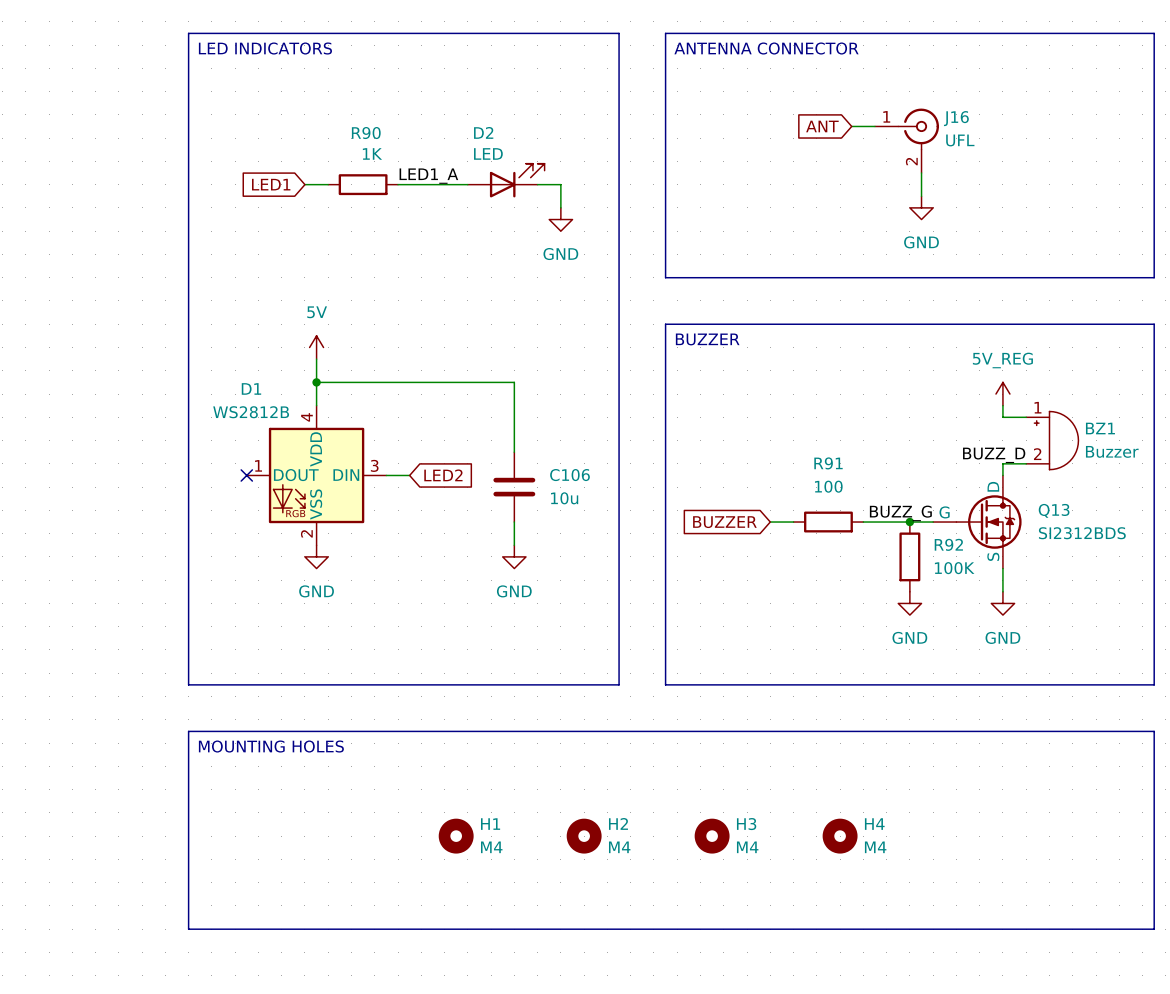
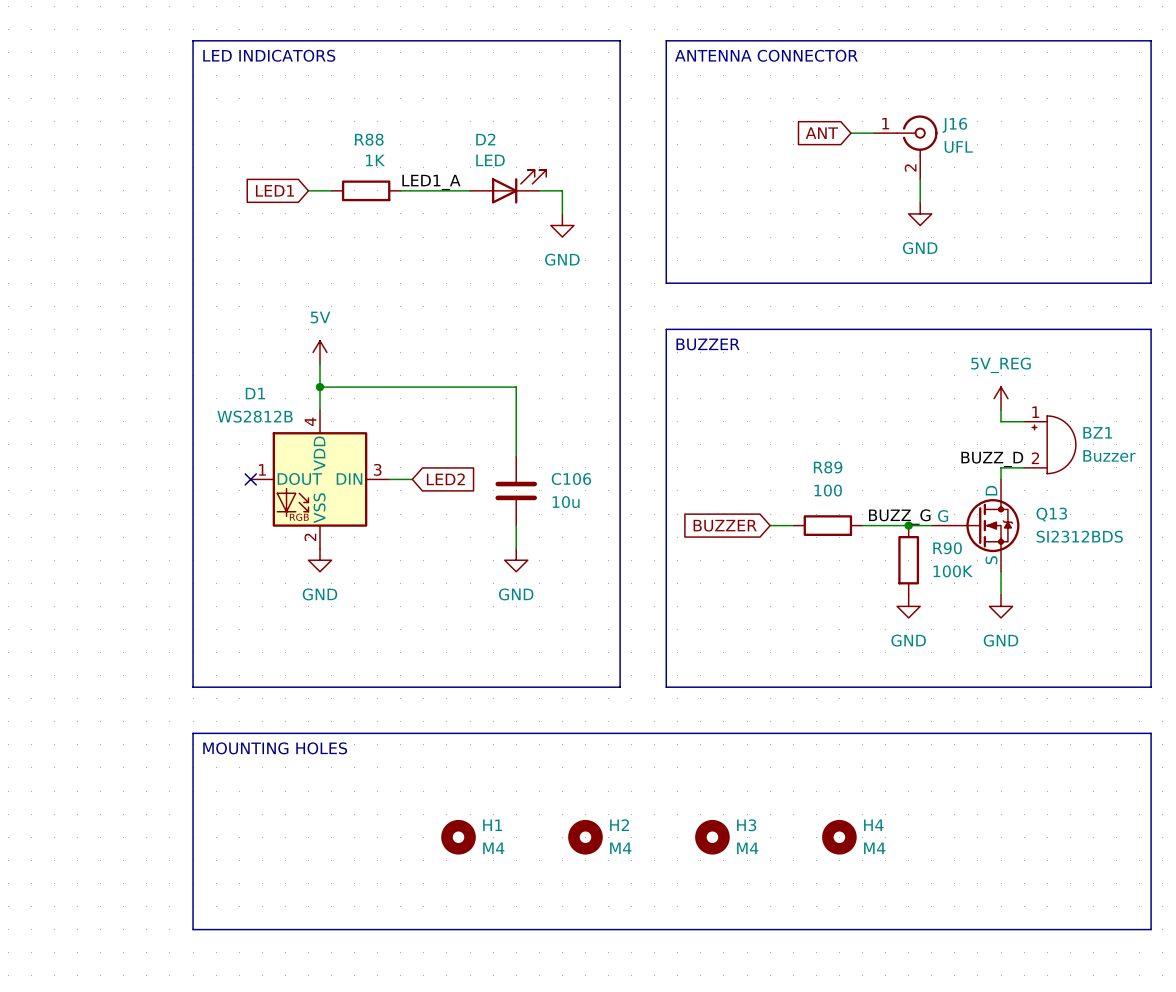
R90 name: R90 (366, 133) -> R88 (369, 139)
R91 name: R91 (828, 463) -> R89 (828, 467)
R92 name: R92 (948, 544) -> R90 (947, 548)

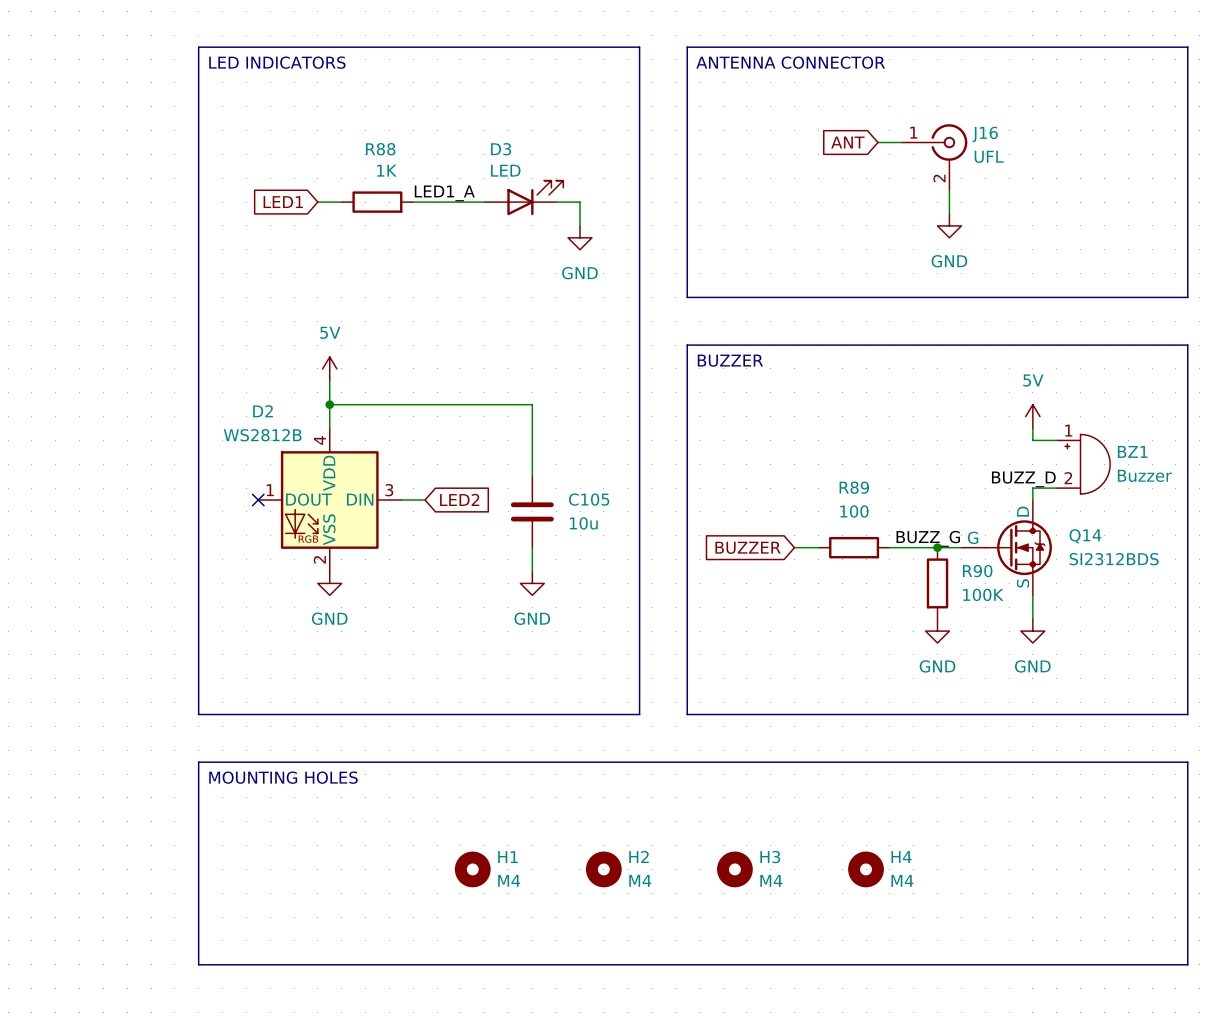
D2 name: D2 (485, 139) -> D3 (501, 149)
D1 name: D1 (255, 393) -> D2 (263, 411)
power symbol: 5V_REG (1001, 398) -> 5V (1032, 416)
C106 name: C106 (571, 479) -> C105 (589, 499)
Q13 name: Q13 (1051, 514) -> Q14 (1085, 536)

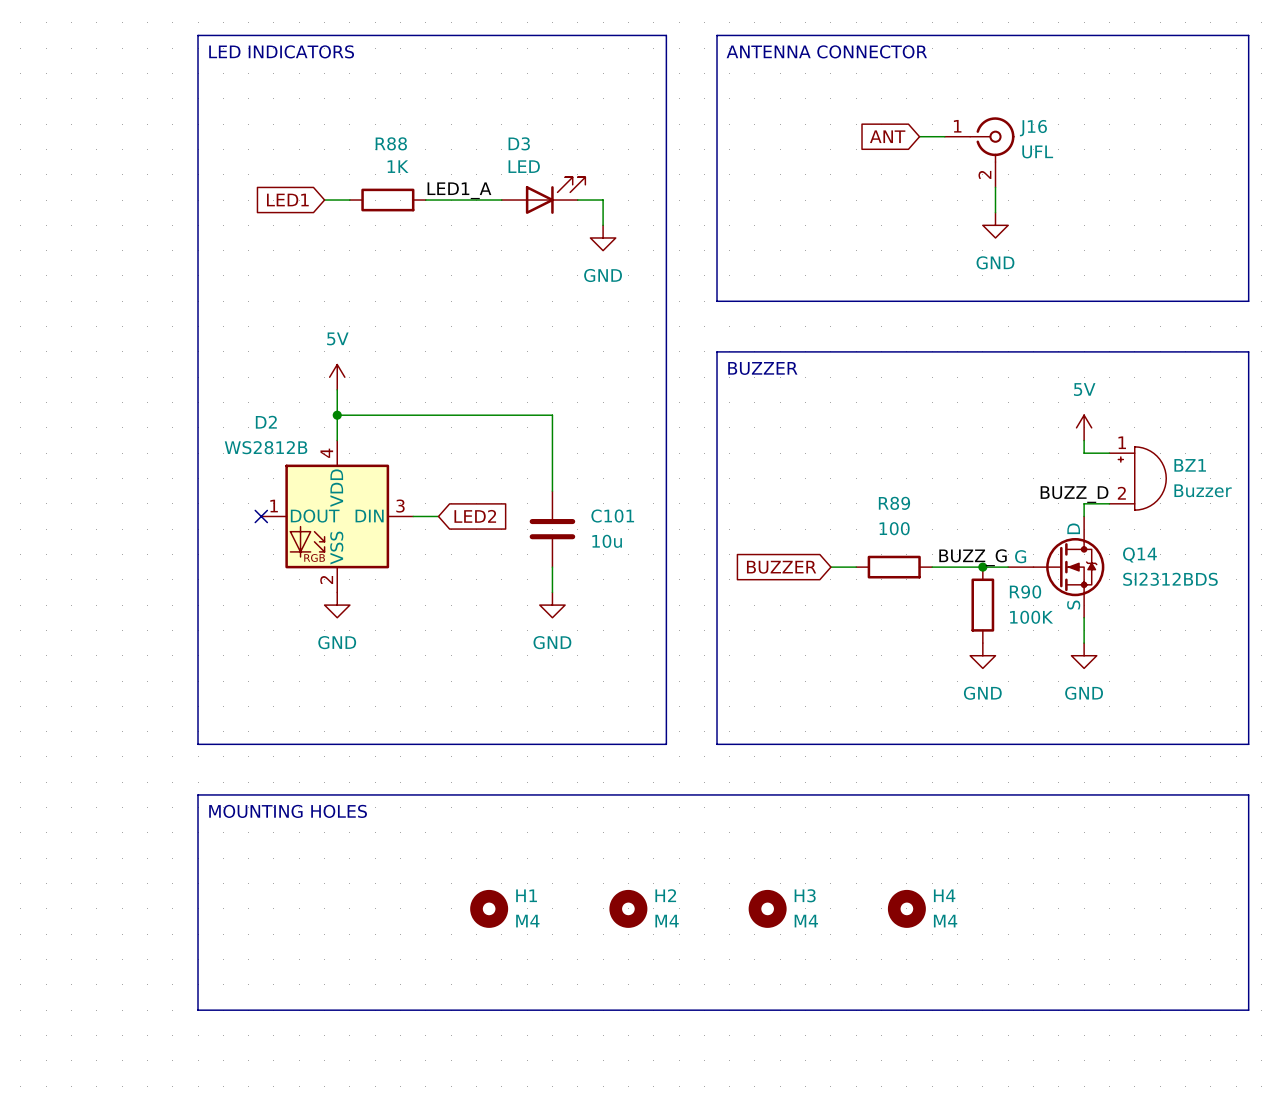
C105 name: C105 (589, 499) -> C101 (612, 516)

